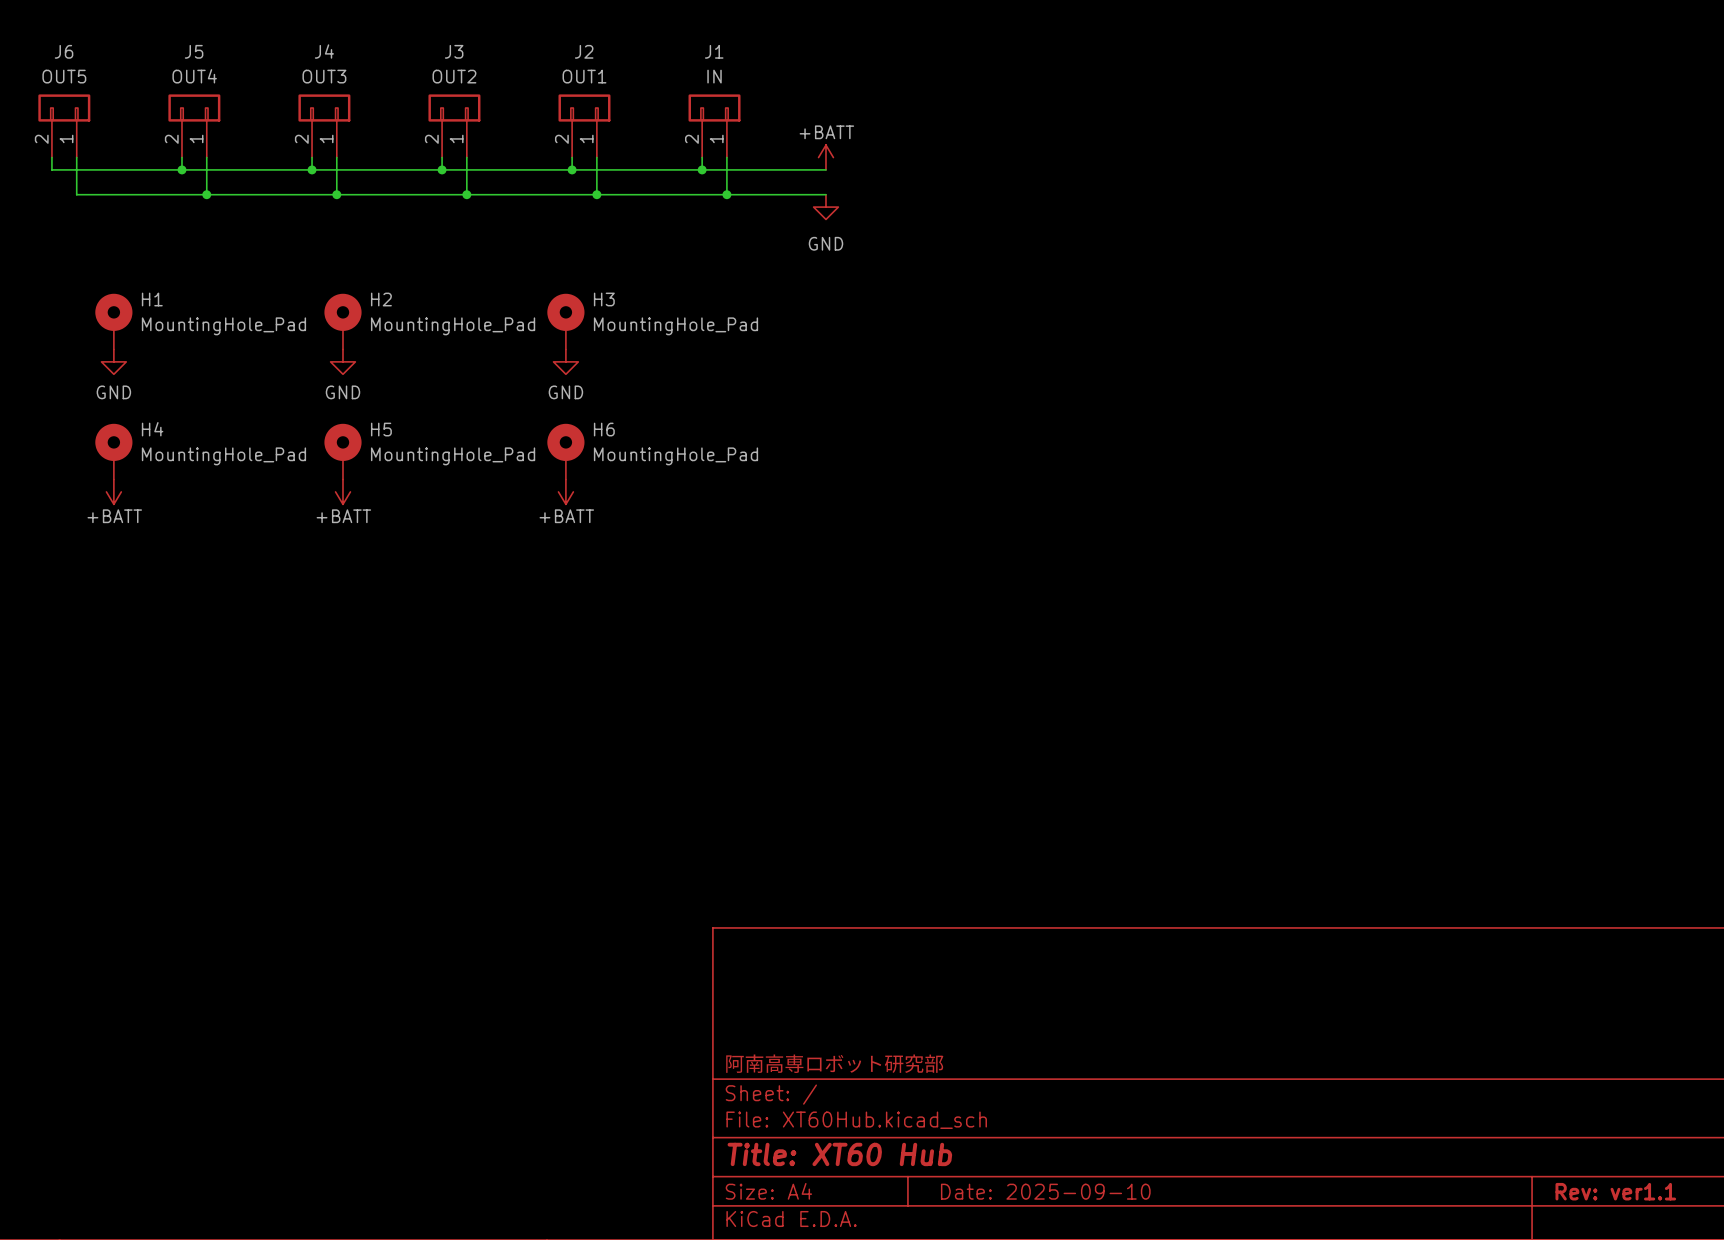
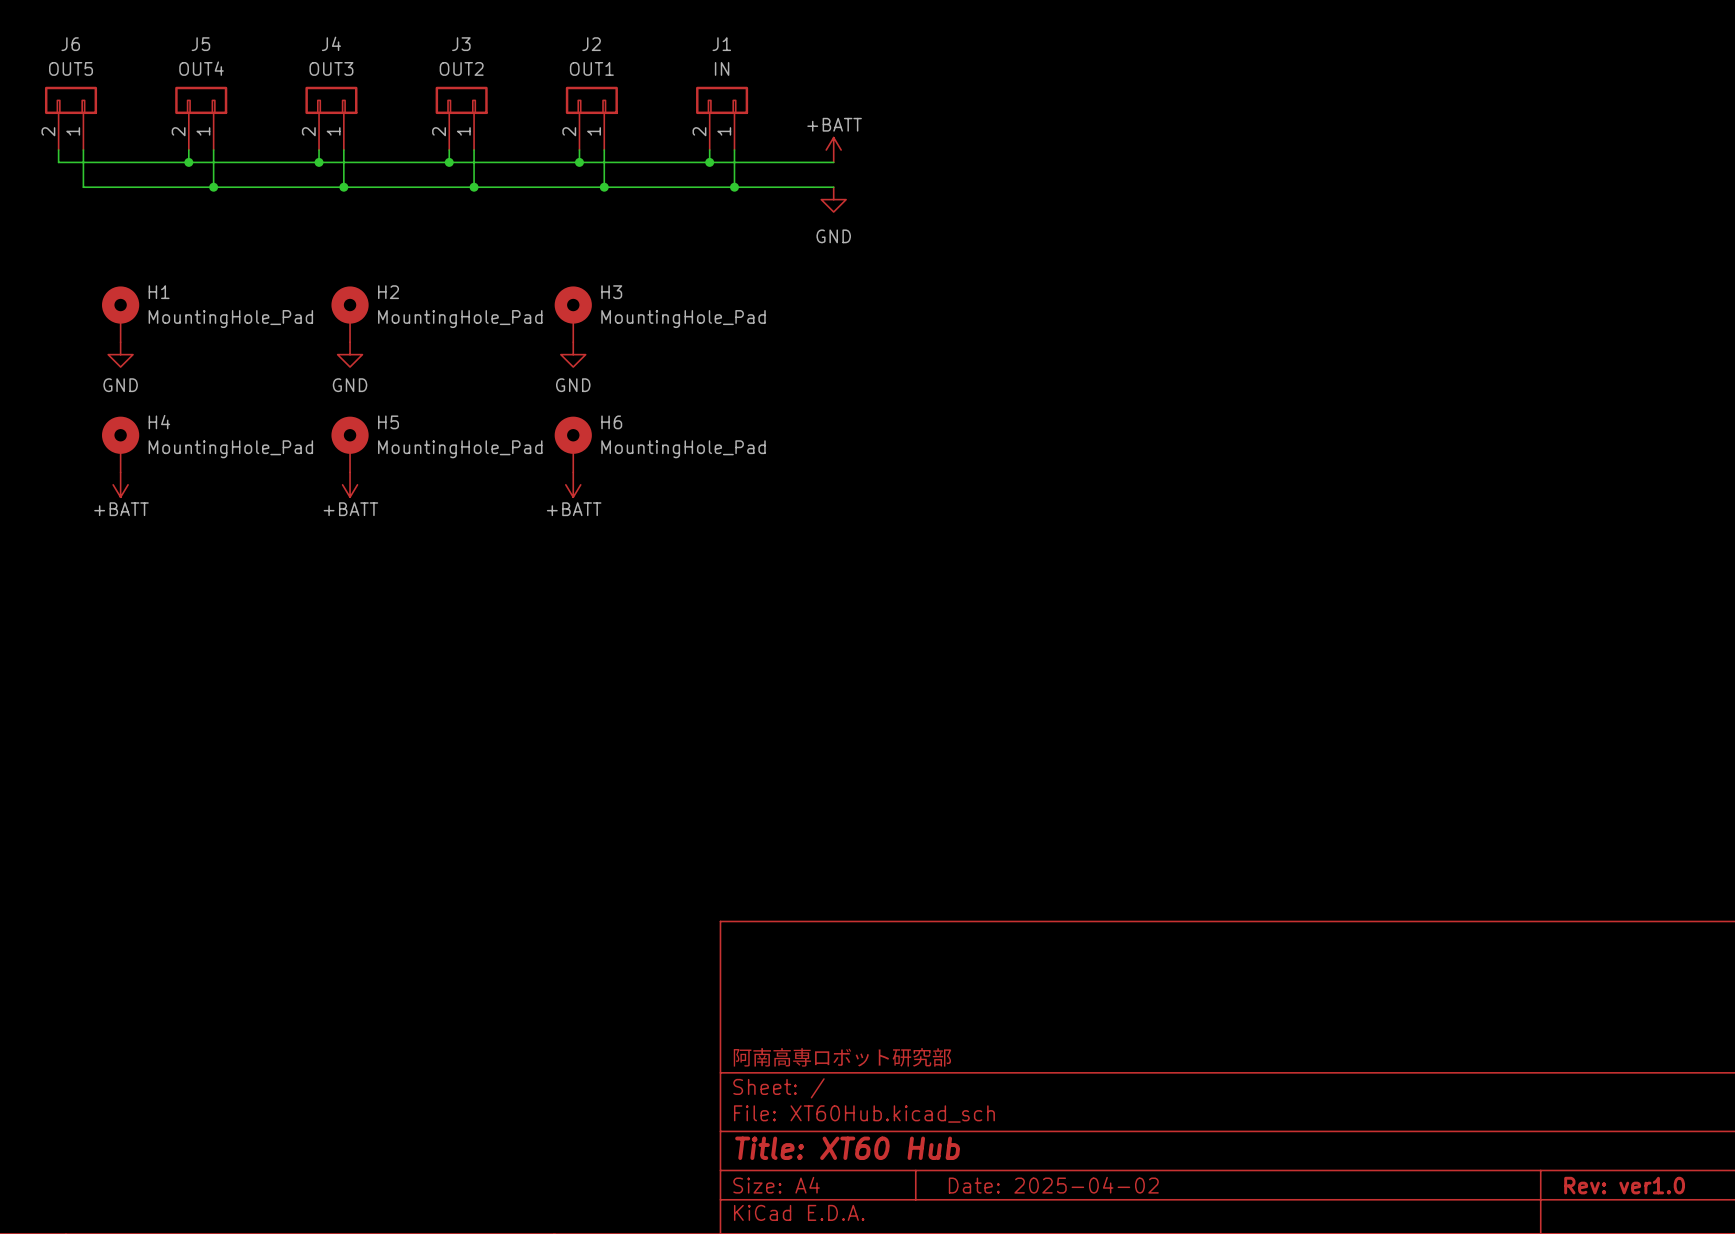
title block: Date: 2025-09-10 (1045, 1191) -> Date: 2025-04-02 (1053, 1185)
title block: Rev: ver1.1 (1615, 1191) -> Rev: ver1.0 (1624, 1185)

